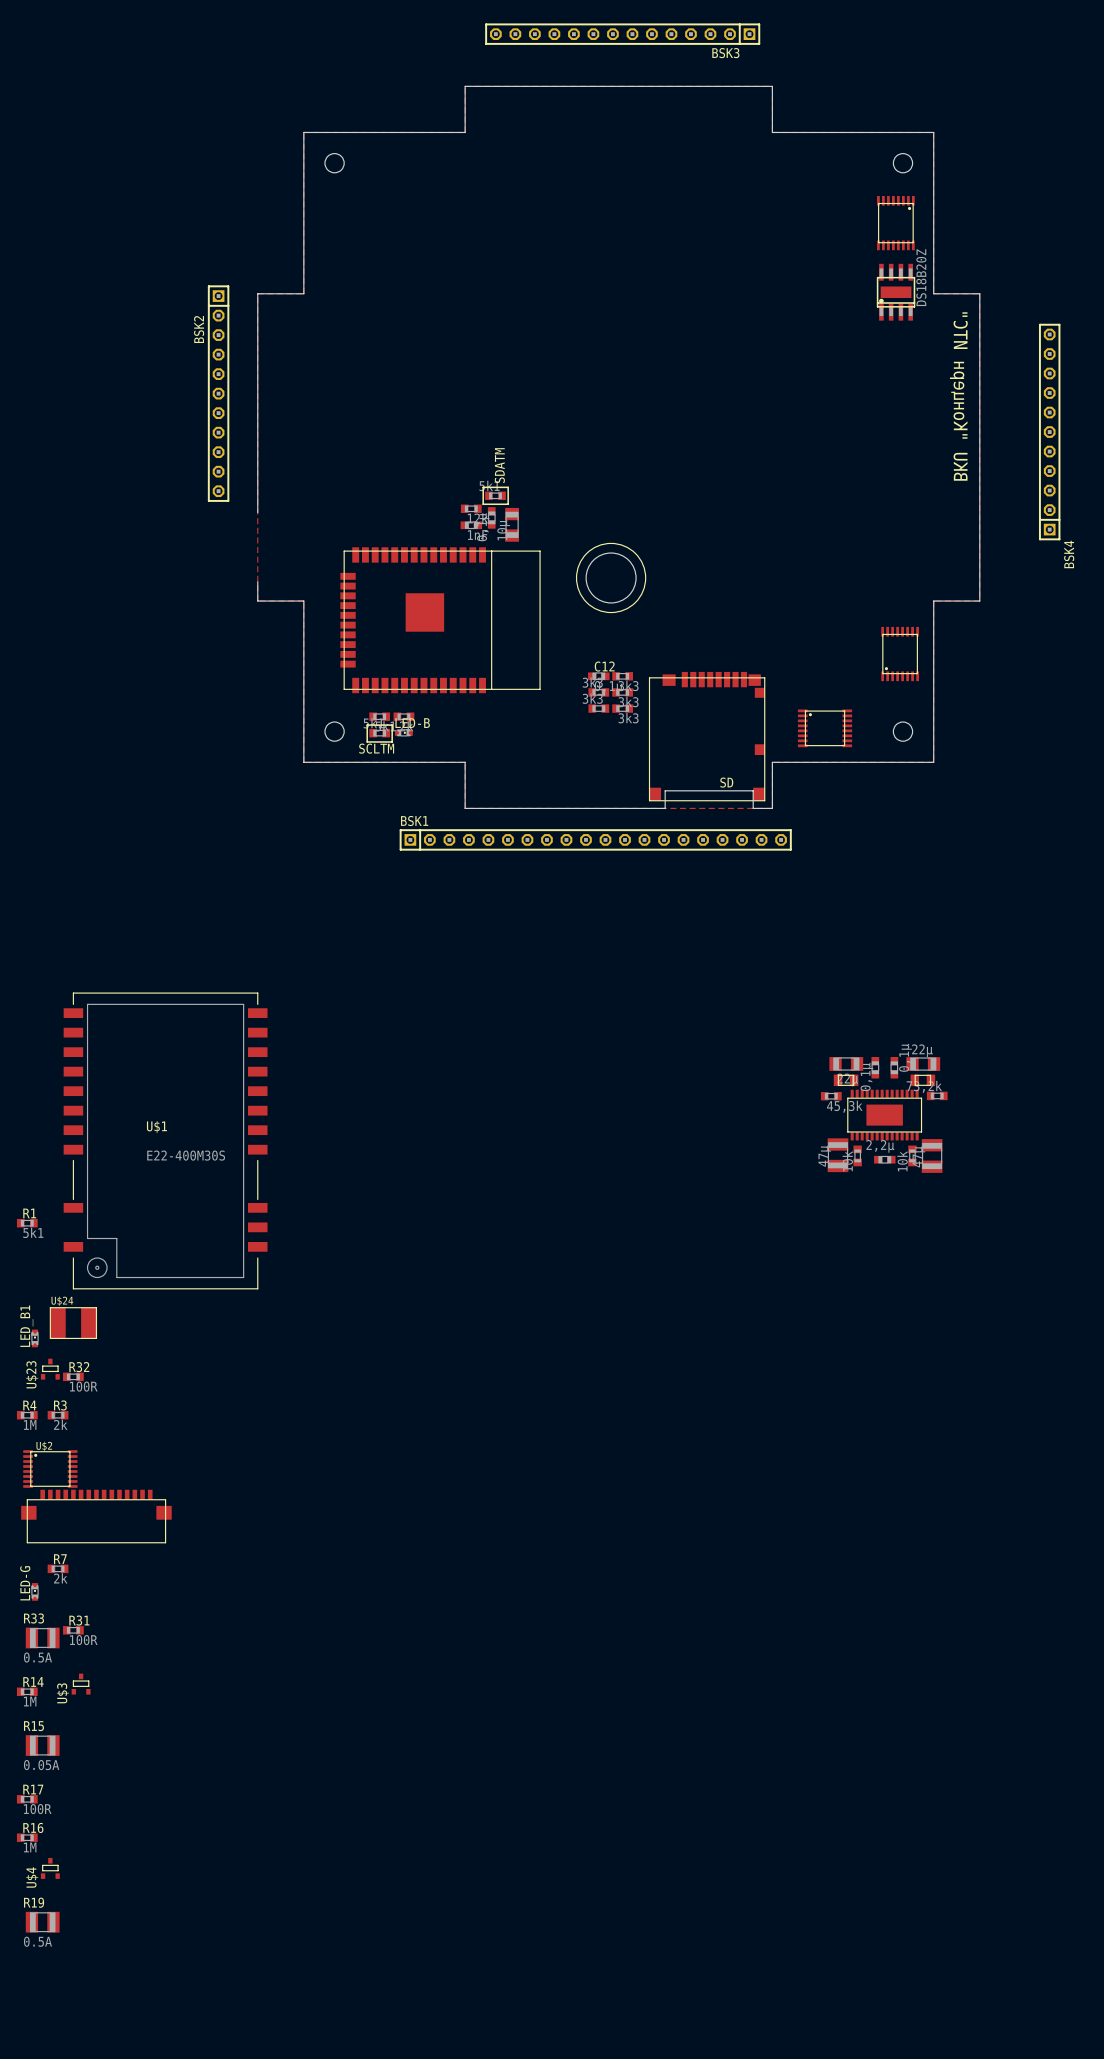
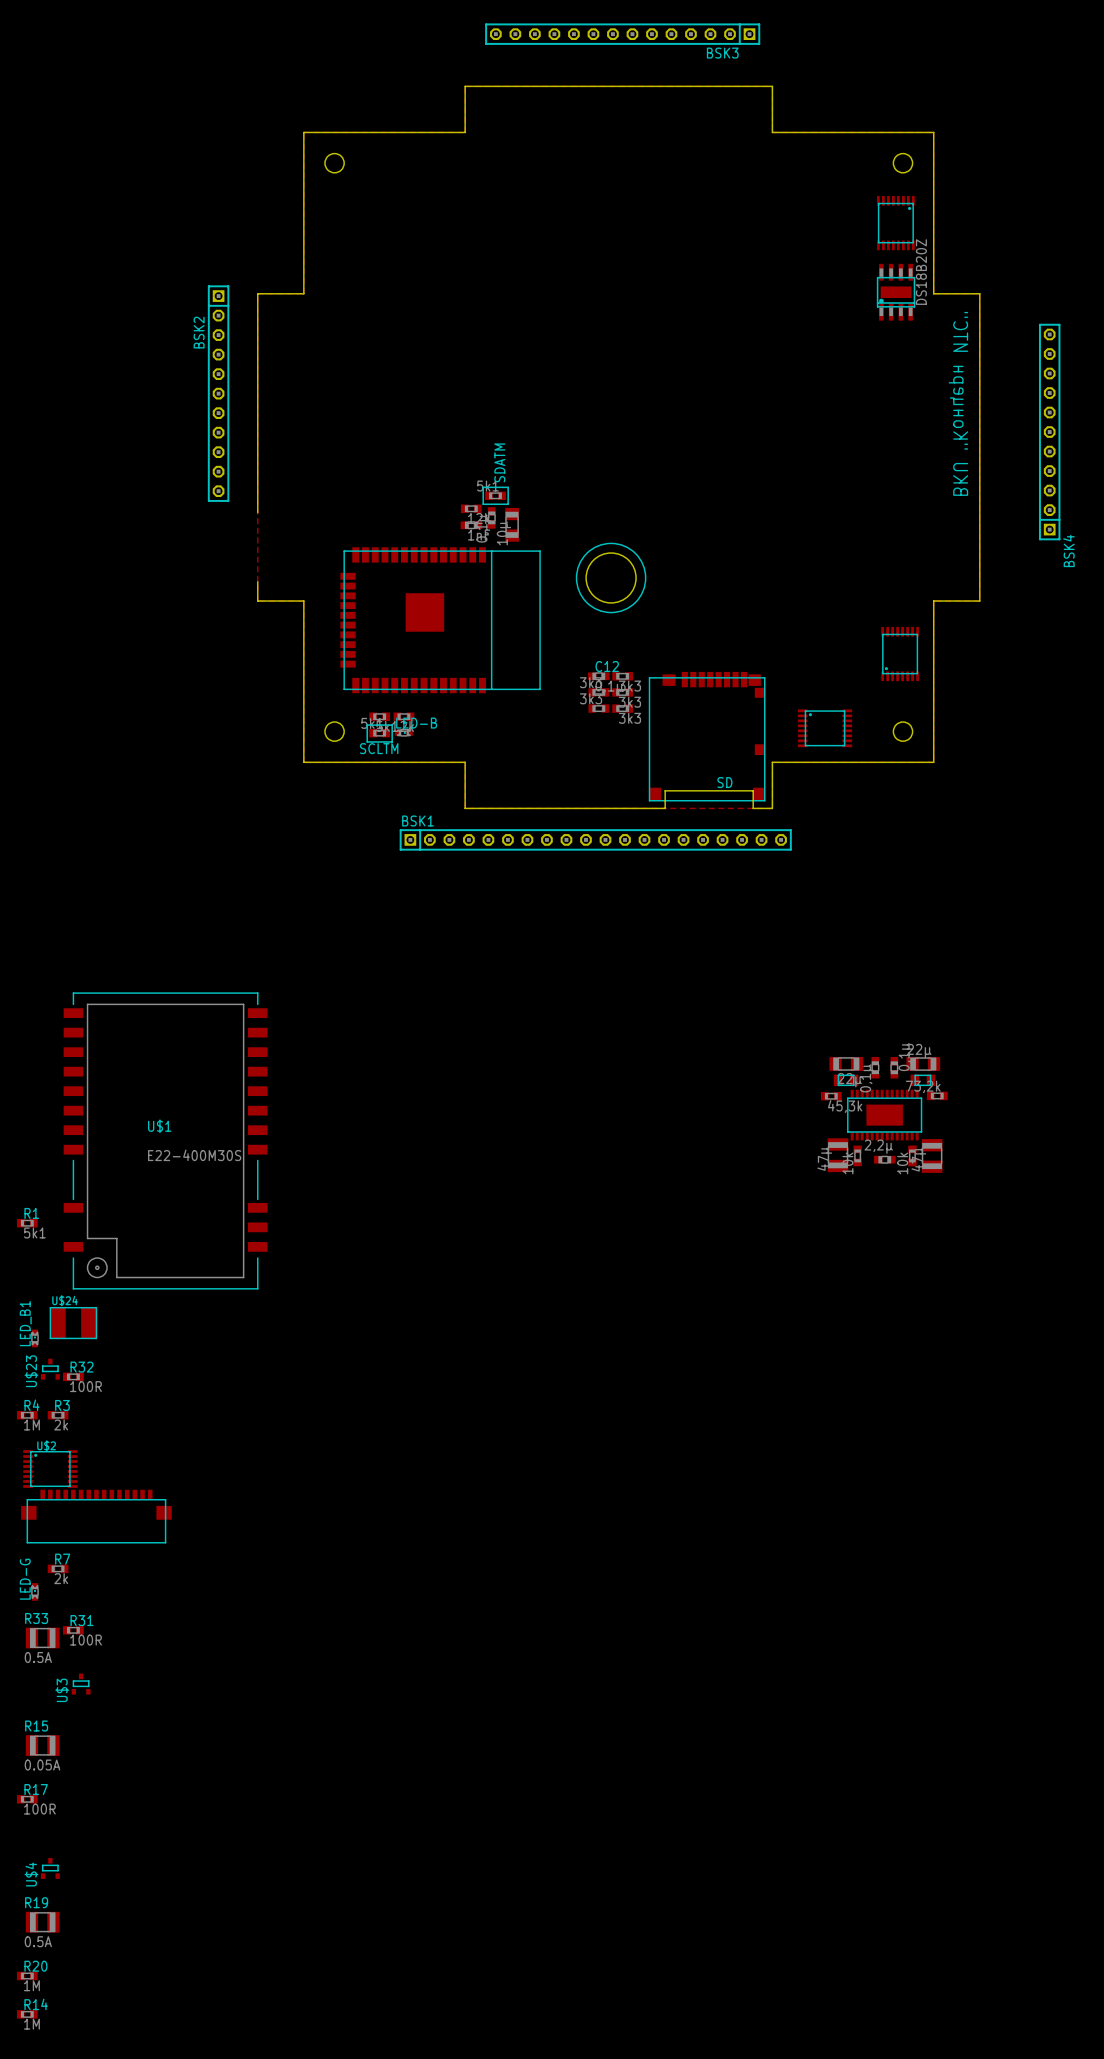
R14 position: (27, 1691) -> (27, 2014)
R16: 1M (27, 1837) -> none
R20: none -> 1M (27, 1975)

